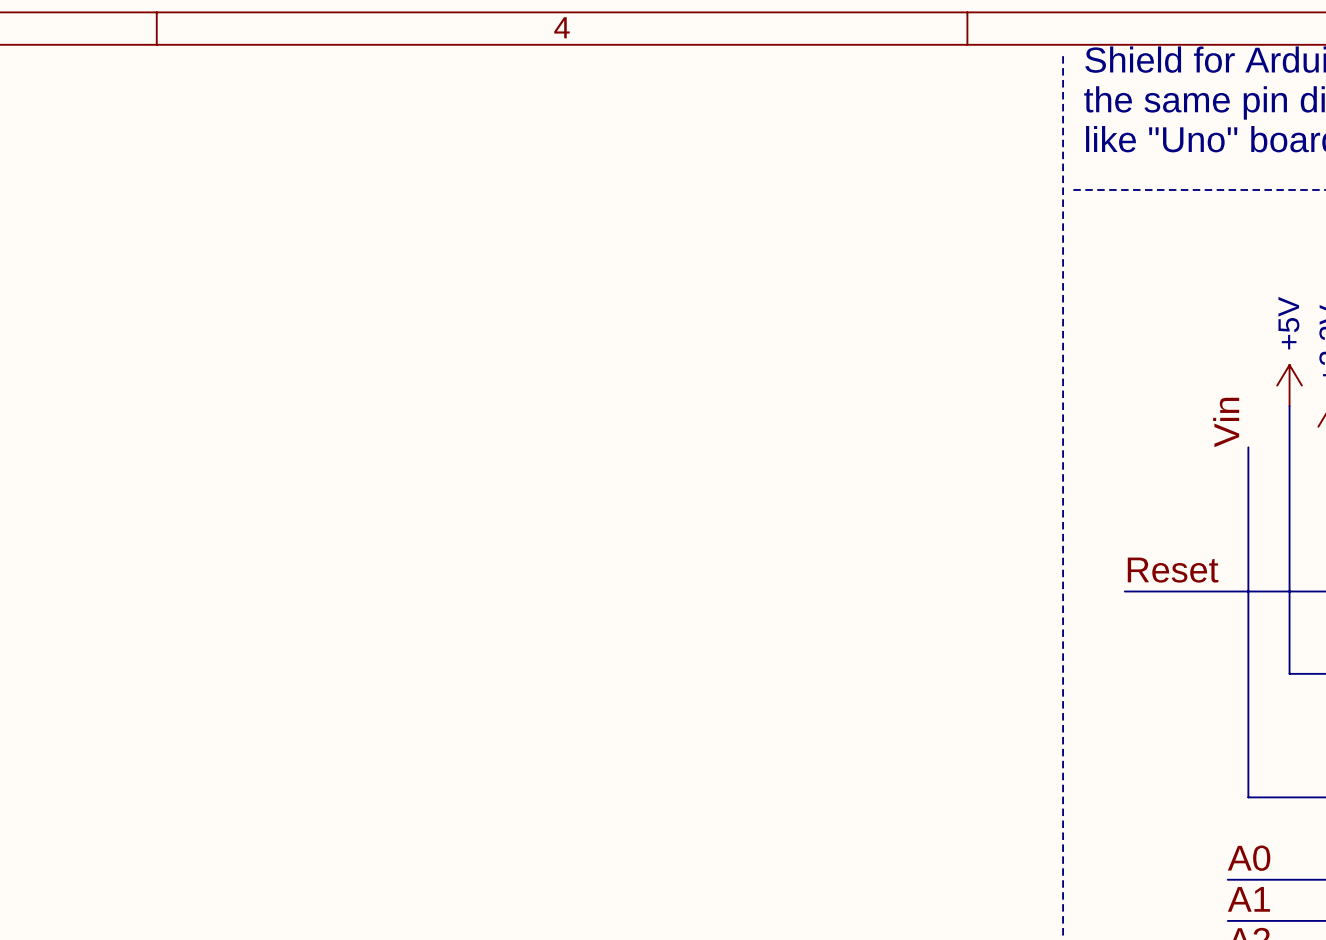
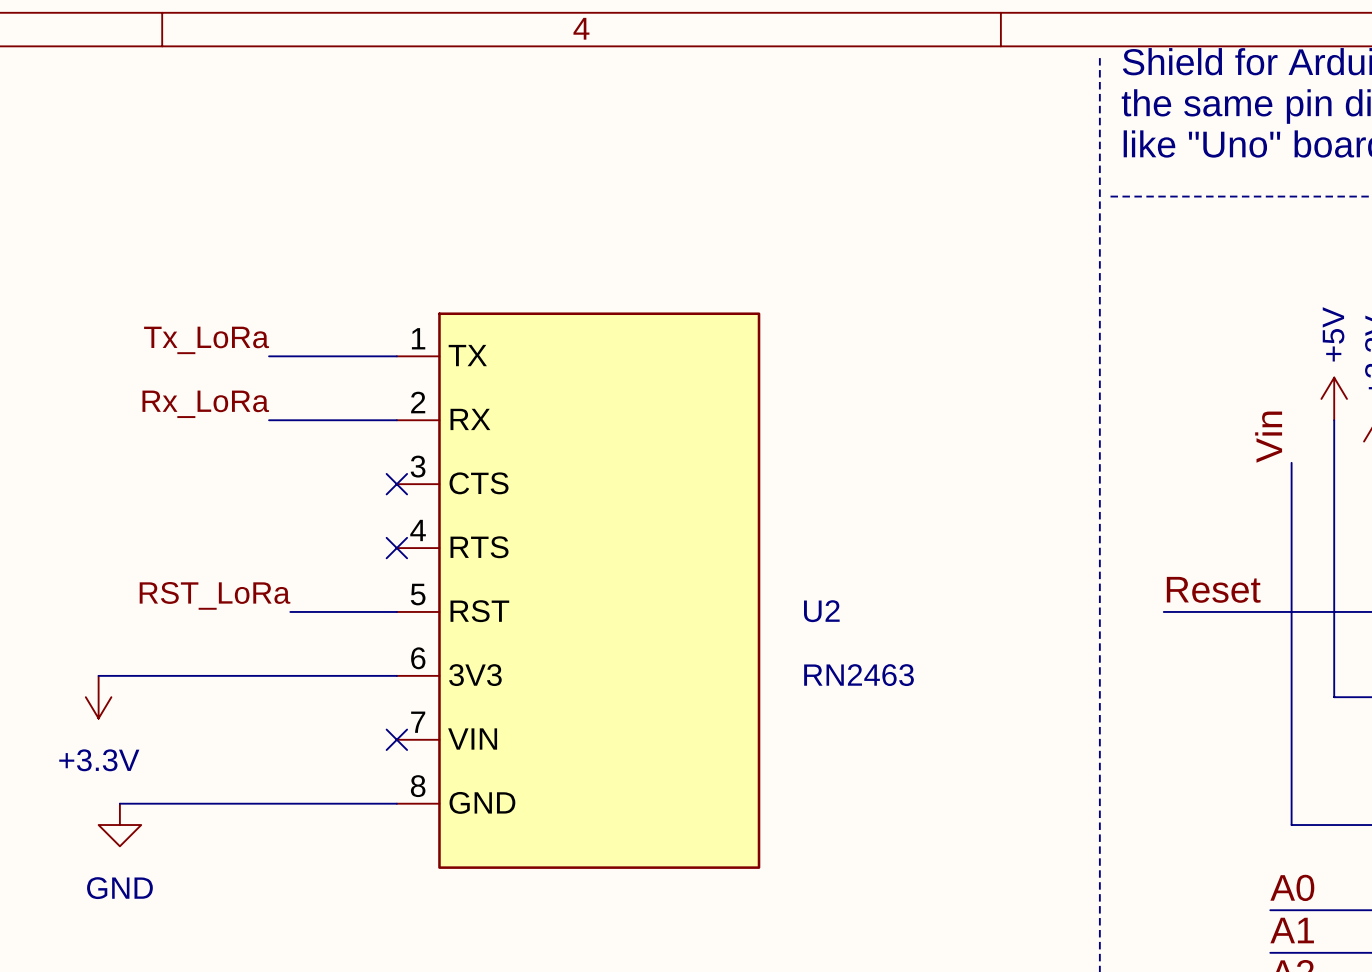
label: none -> Tx_LoRa (206, 340)
wire: none -> (269, 356) (396, 356)
label: none -> Rx_LoRa (205, 404)
wire: none -> (269, 420) (396, 420)
no-connect mark: none -> (396, 484)
no-connect mark: none -> (396, 548)
U2: none -> RN2463 (578, 590)
label: none -> RST_LoRa (215, 595)
wire: none -> (290, 611) (396, 611)
wire: none -> (98, 675) (396, 675)
power symbol: none -> +3.3V (98, 697)
no-connect mark: none -> (396, 739)
wire: none -> (119, 803) (396, 803)
power symbol: none -> GND (119, 825)

